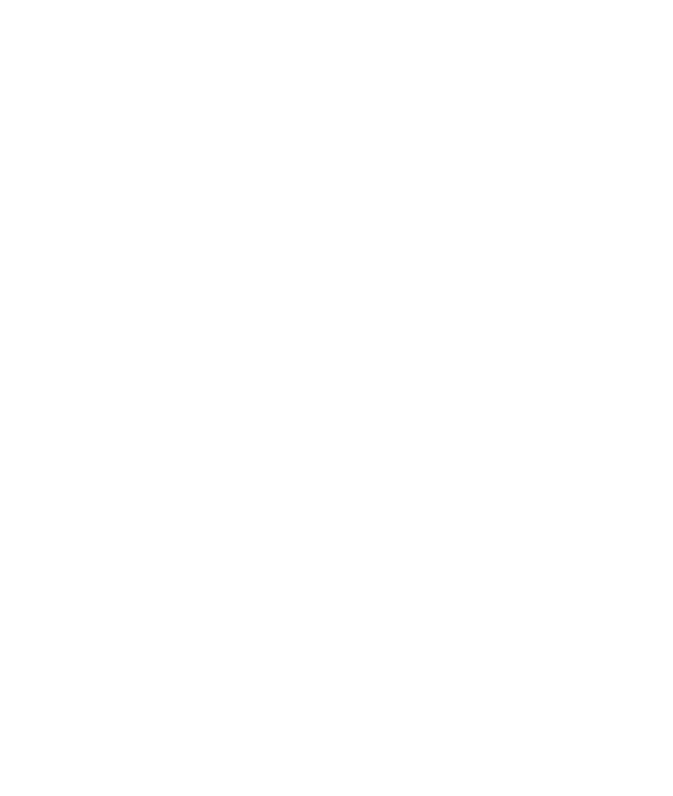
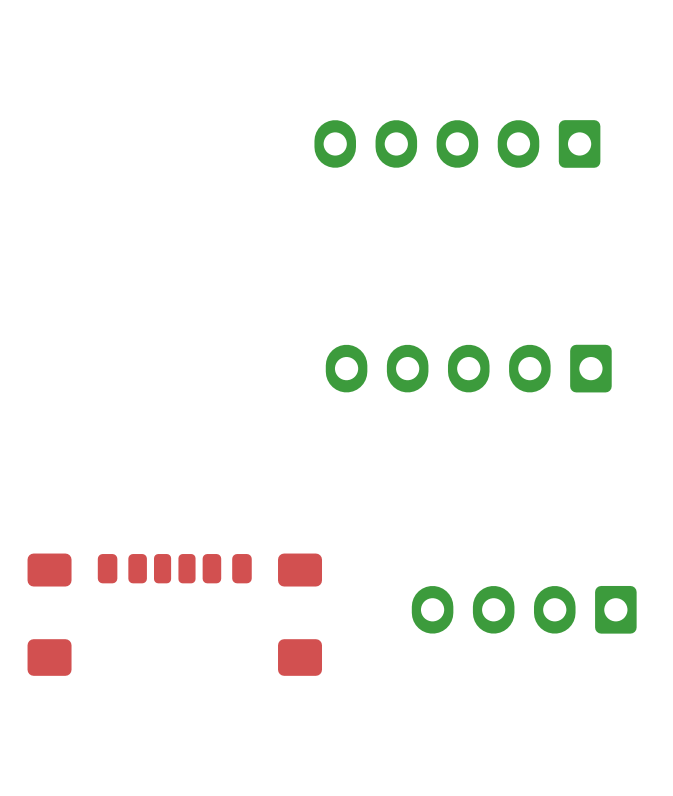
part: none -> (457, 143)
part: none -> (468, 368)
part: none -> (524, 609)
part: none -> (174, 614)

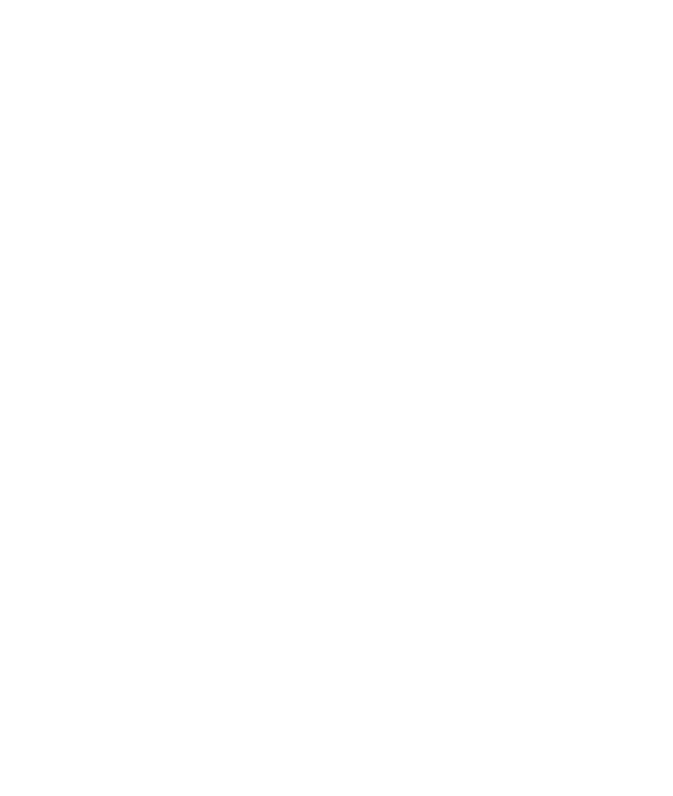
part: (457, 143) -> none
part: (468, 368) -> none
part: (524, 609) -> none
part: (174, 614) -> none

